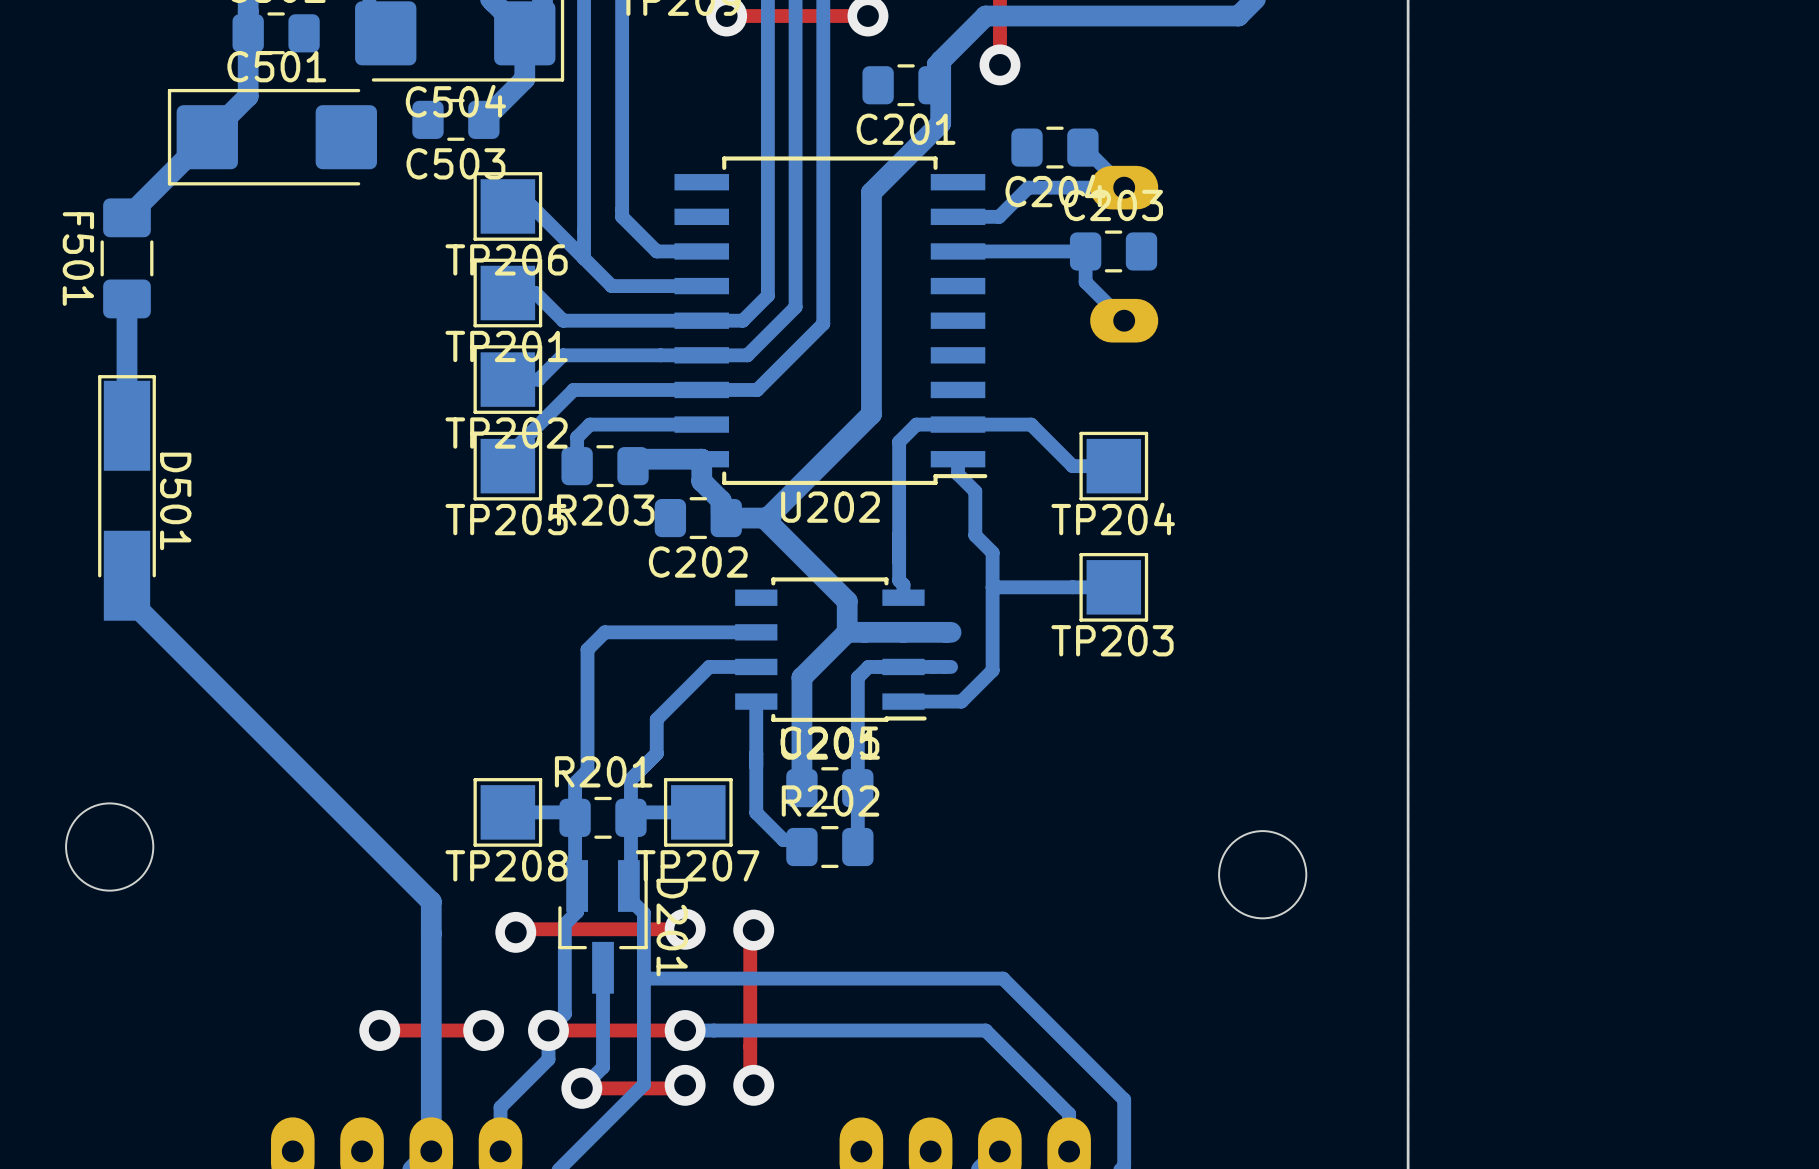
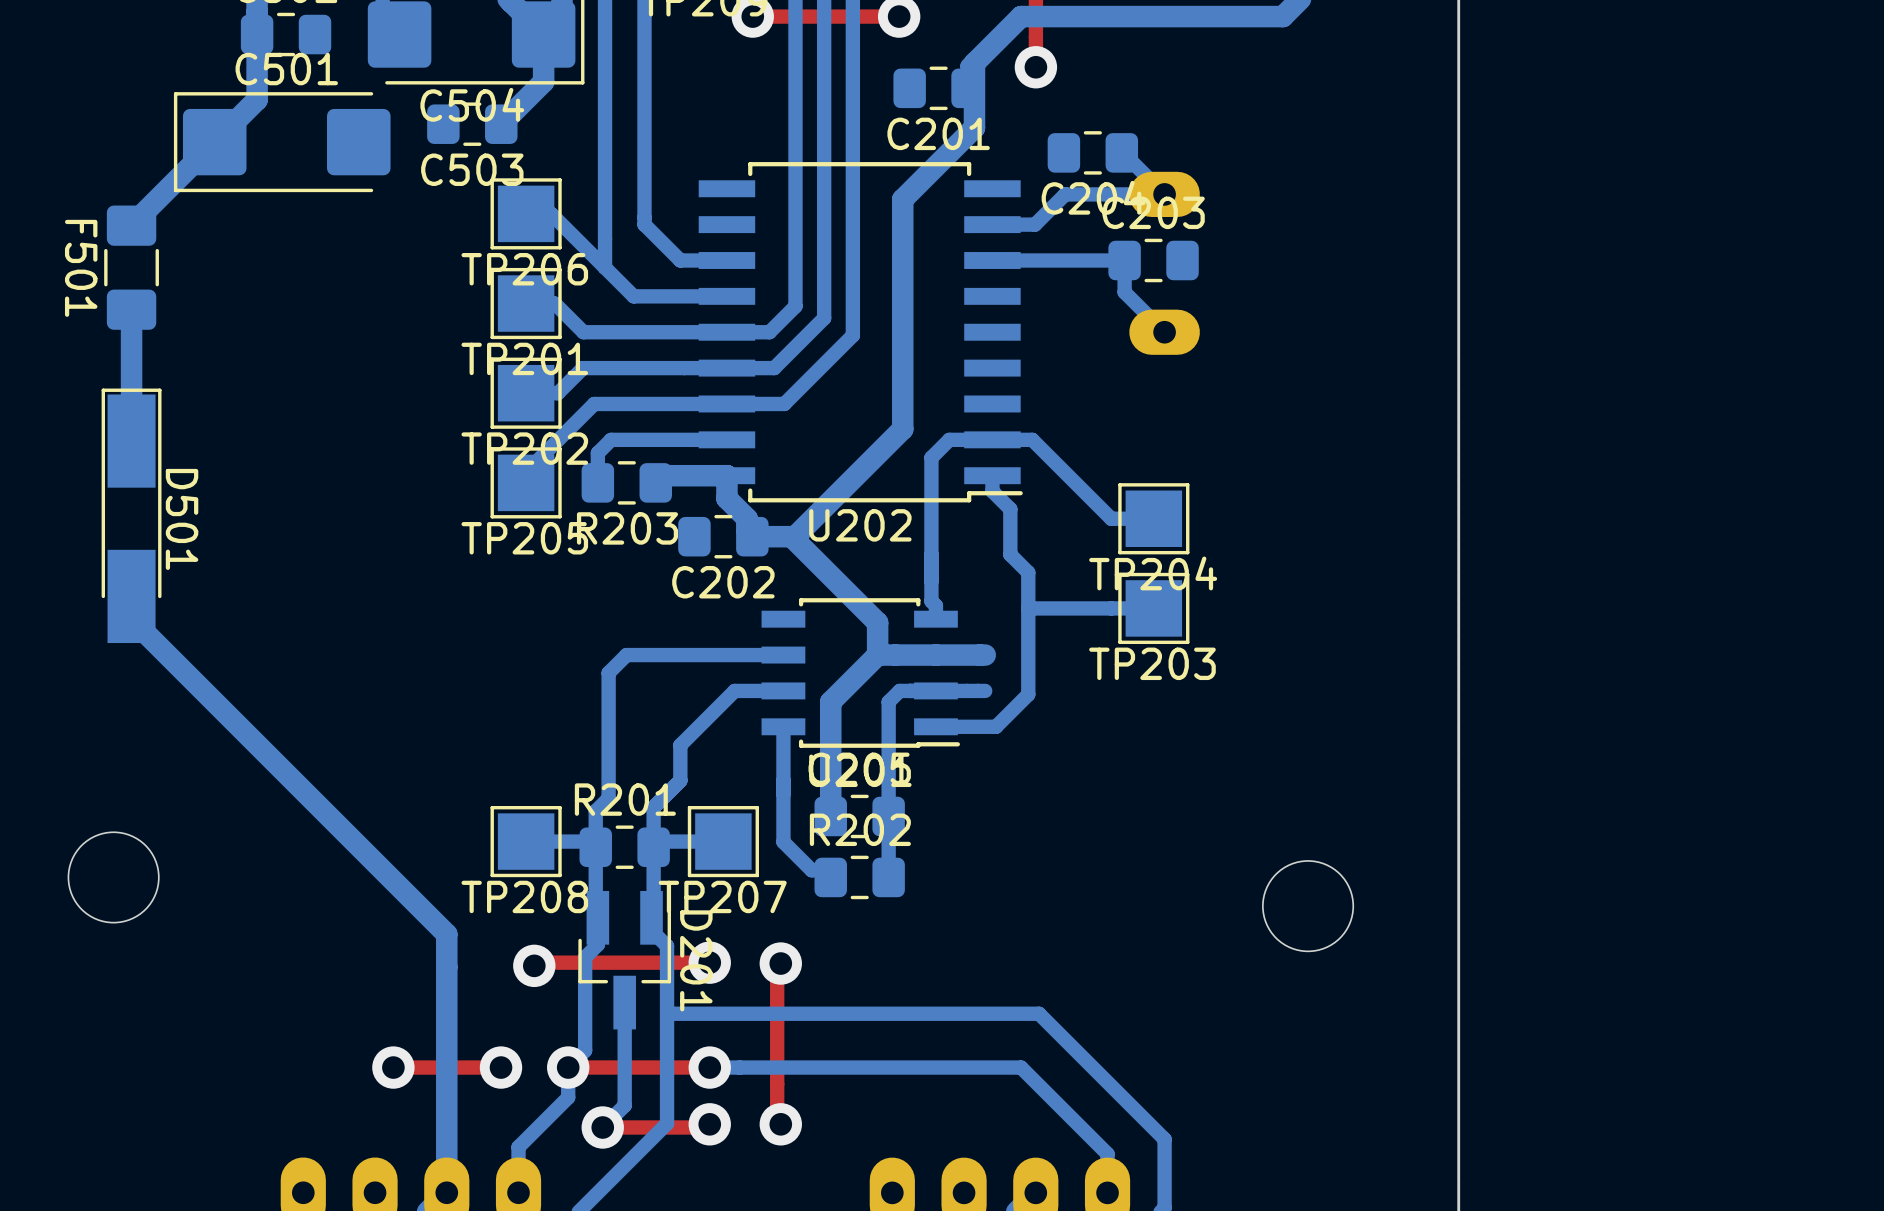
bottom track: (996, 424) (1031, 424) (1072, 466) (1113, 466) -> (1032, 439) (1111, 518) (1153, 518)
TP204 position: (1113, 466) -> (1153, 518)

